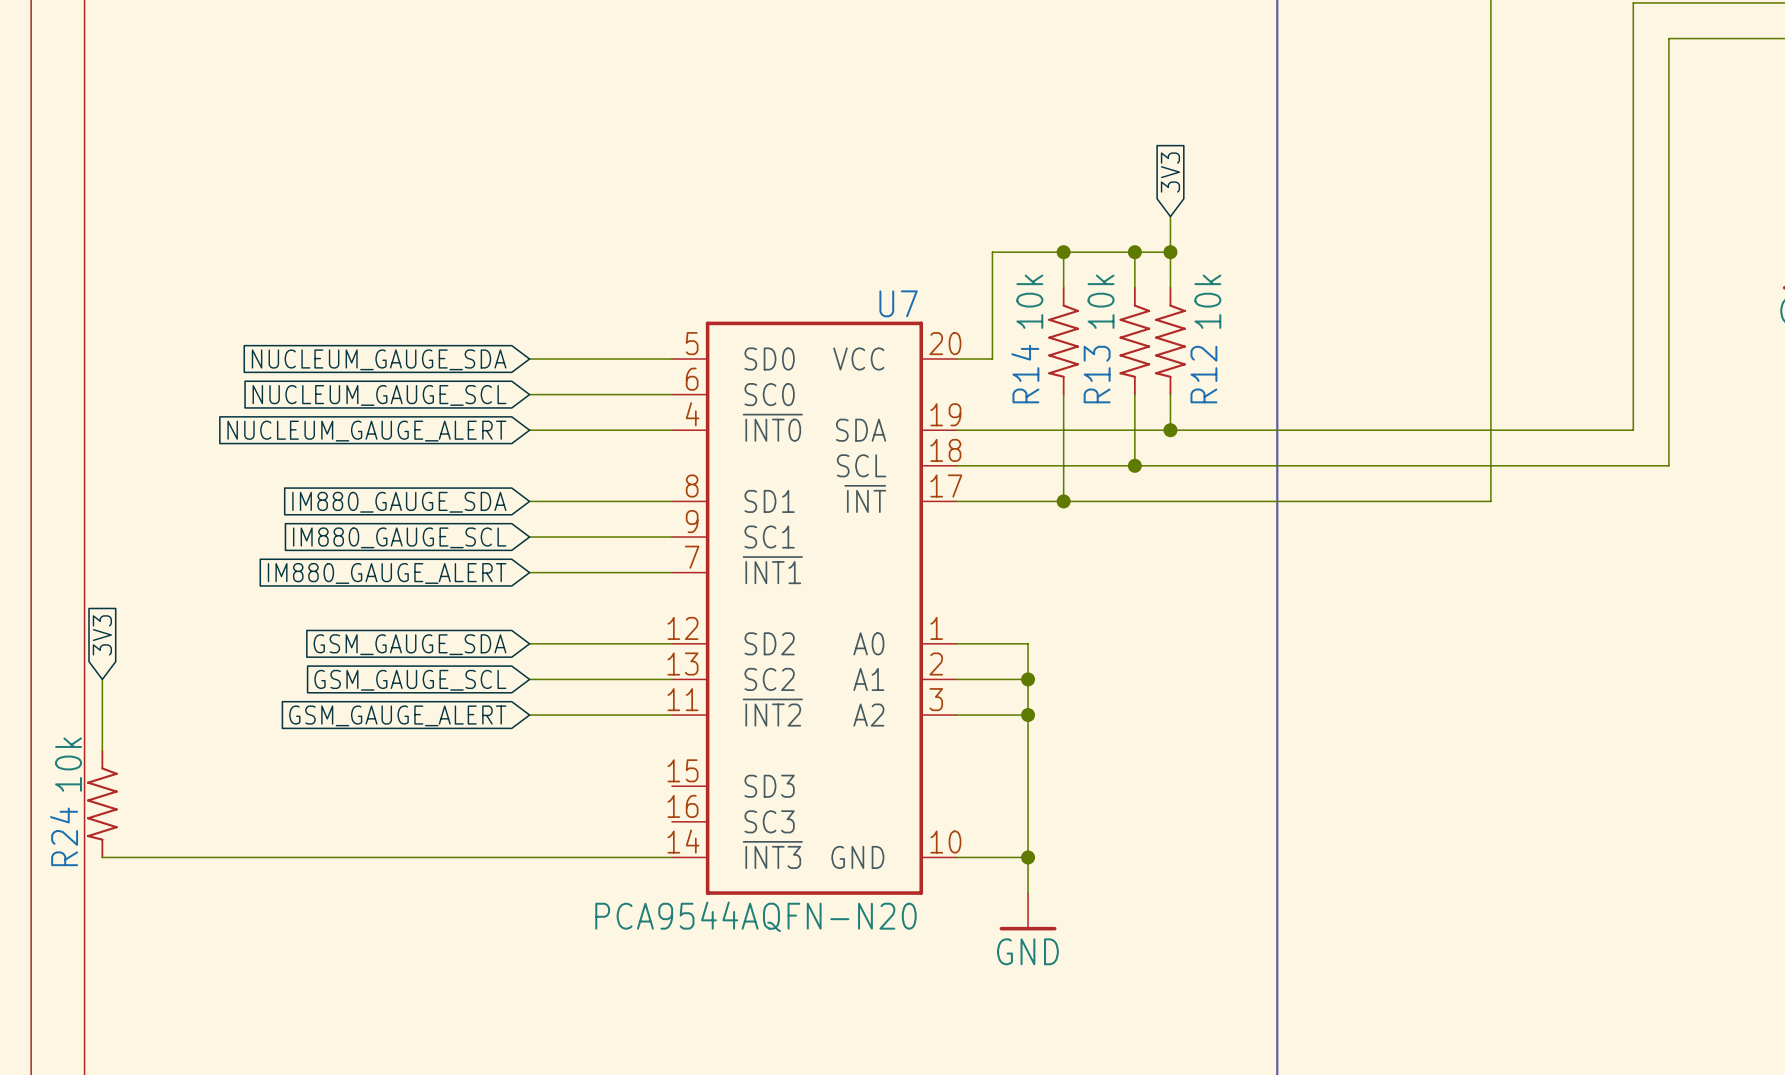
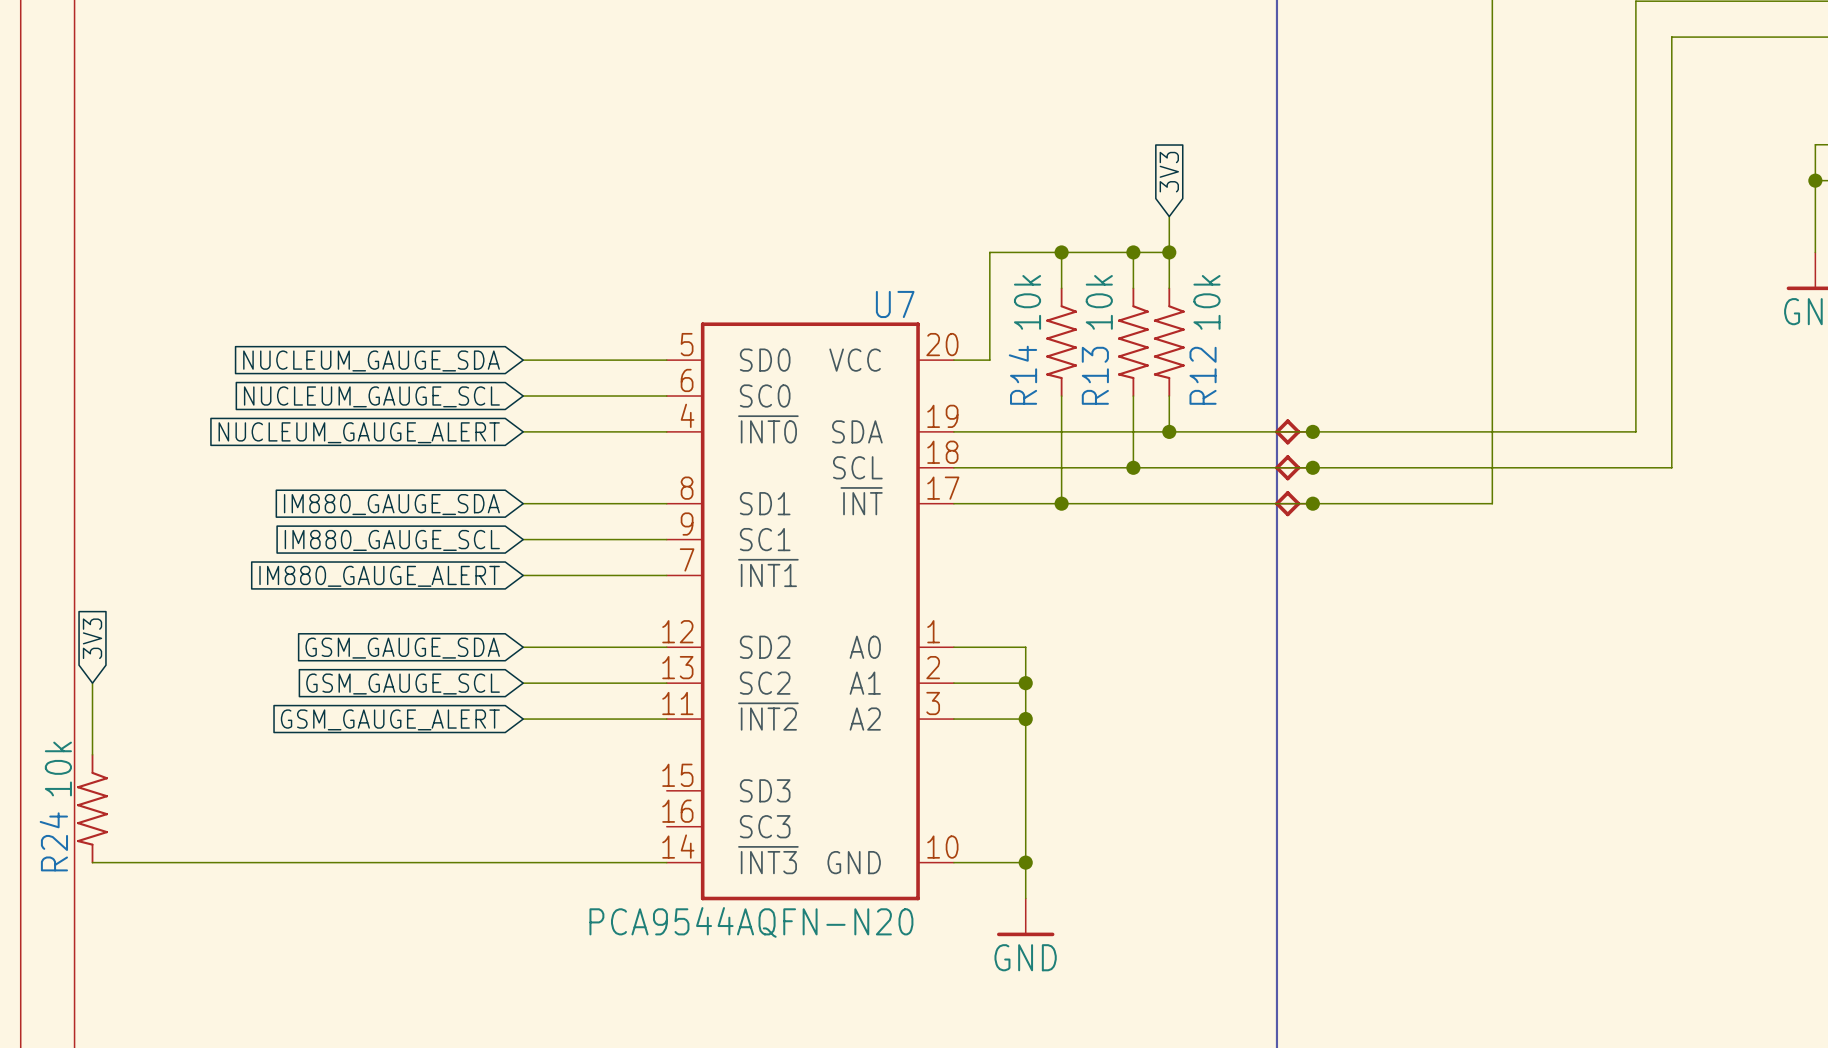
part: none -> (1294, 431)
junction: none -> (1312, 431)
part: none -> (1294, 467)
junction: none -> (1312, 467)
part: none -> (1294, 503)
junction: none -> (1312, 503)

